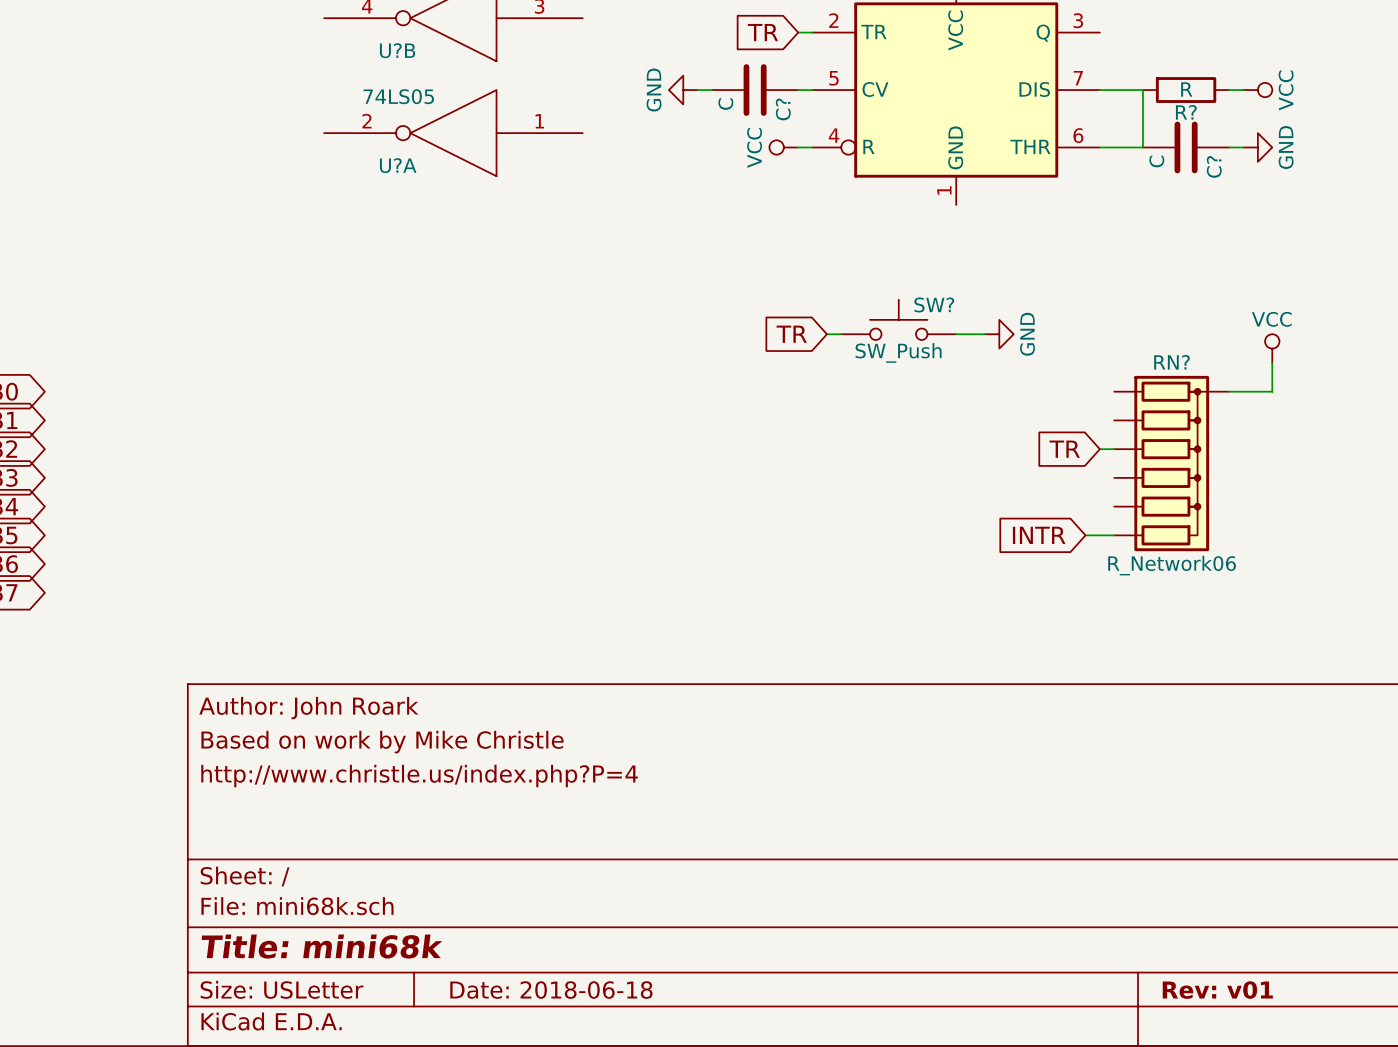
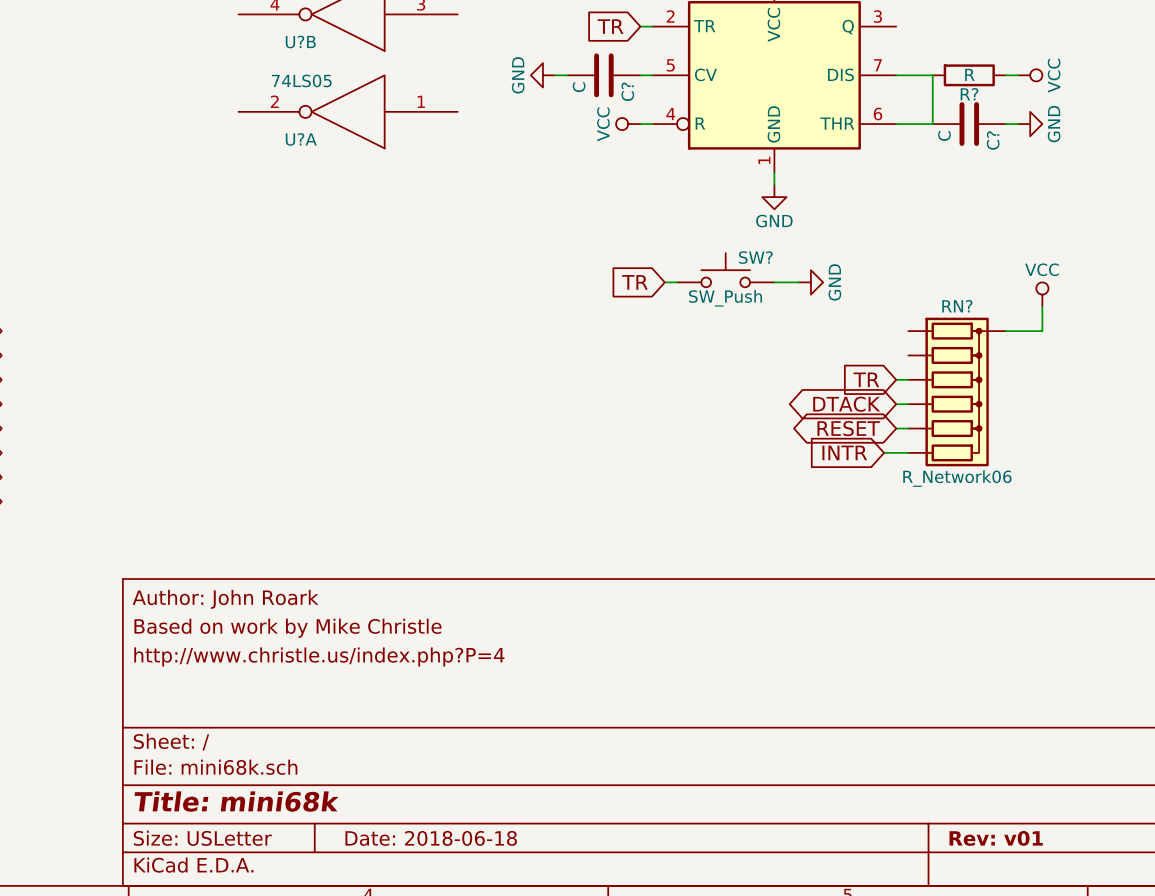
wire: none -> (774, 172) (774, 184)
power symbol: none -> GND (774, 197)
global label: none -> DTACK (846, 404)
wire: none -> (896, 404) (908, 404)
global label: none -> RESET (848, 428)
wire: none -> (896, 428) (908, 428)

